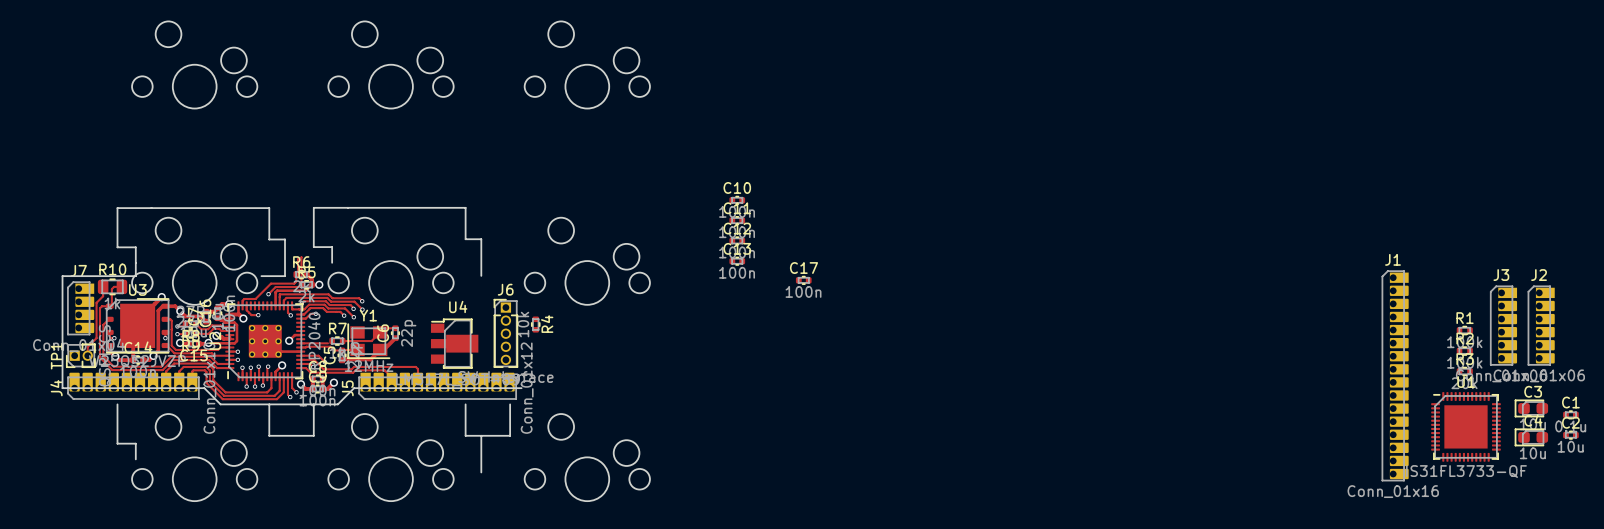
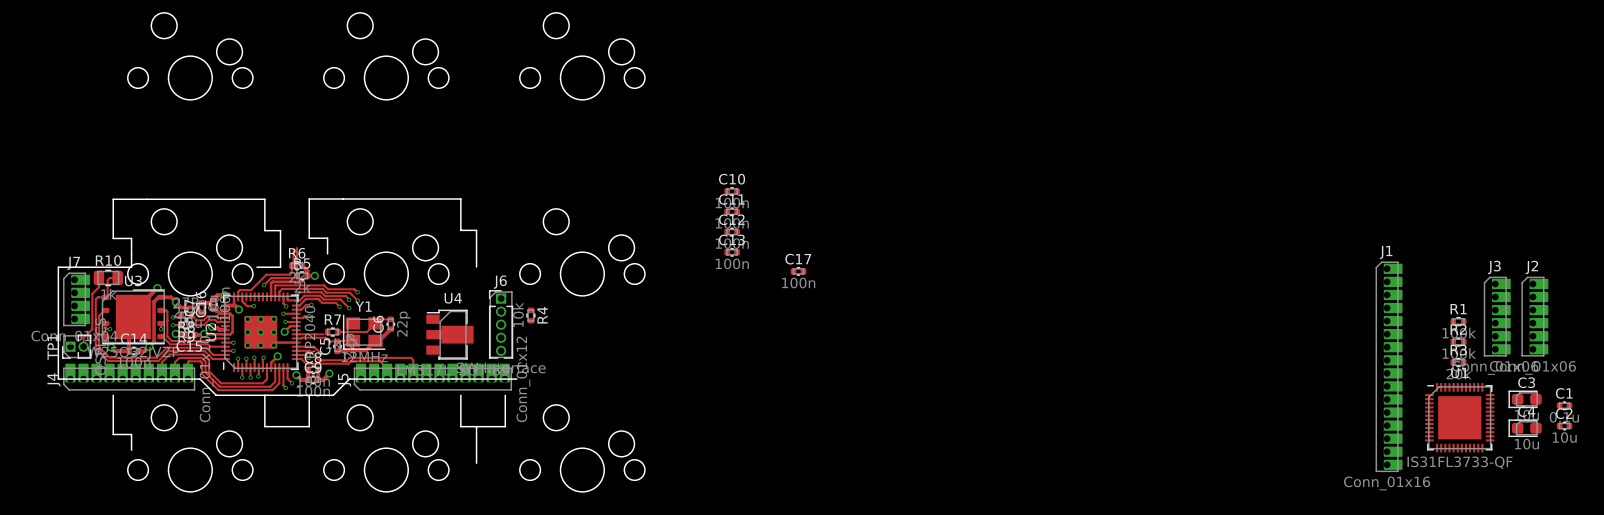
track: none -> (283, 313) (296, 313)
via: none -> (283, 313)
track: none -> (309, 316) (296, 317)
via: none -> (309, 316)
via: none -> (285, 321)
track: none -> (285, 321) (296, 321)

